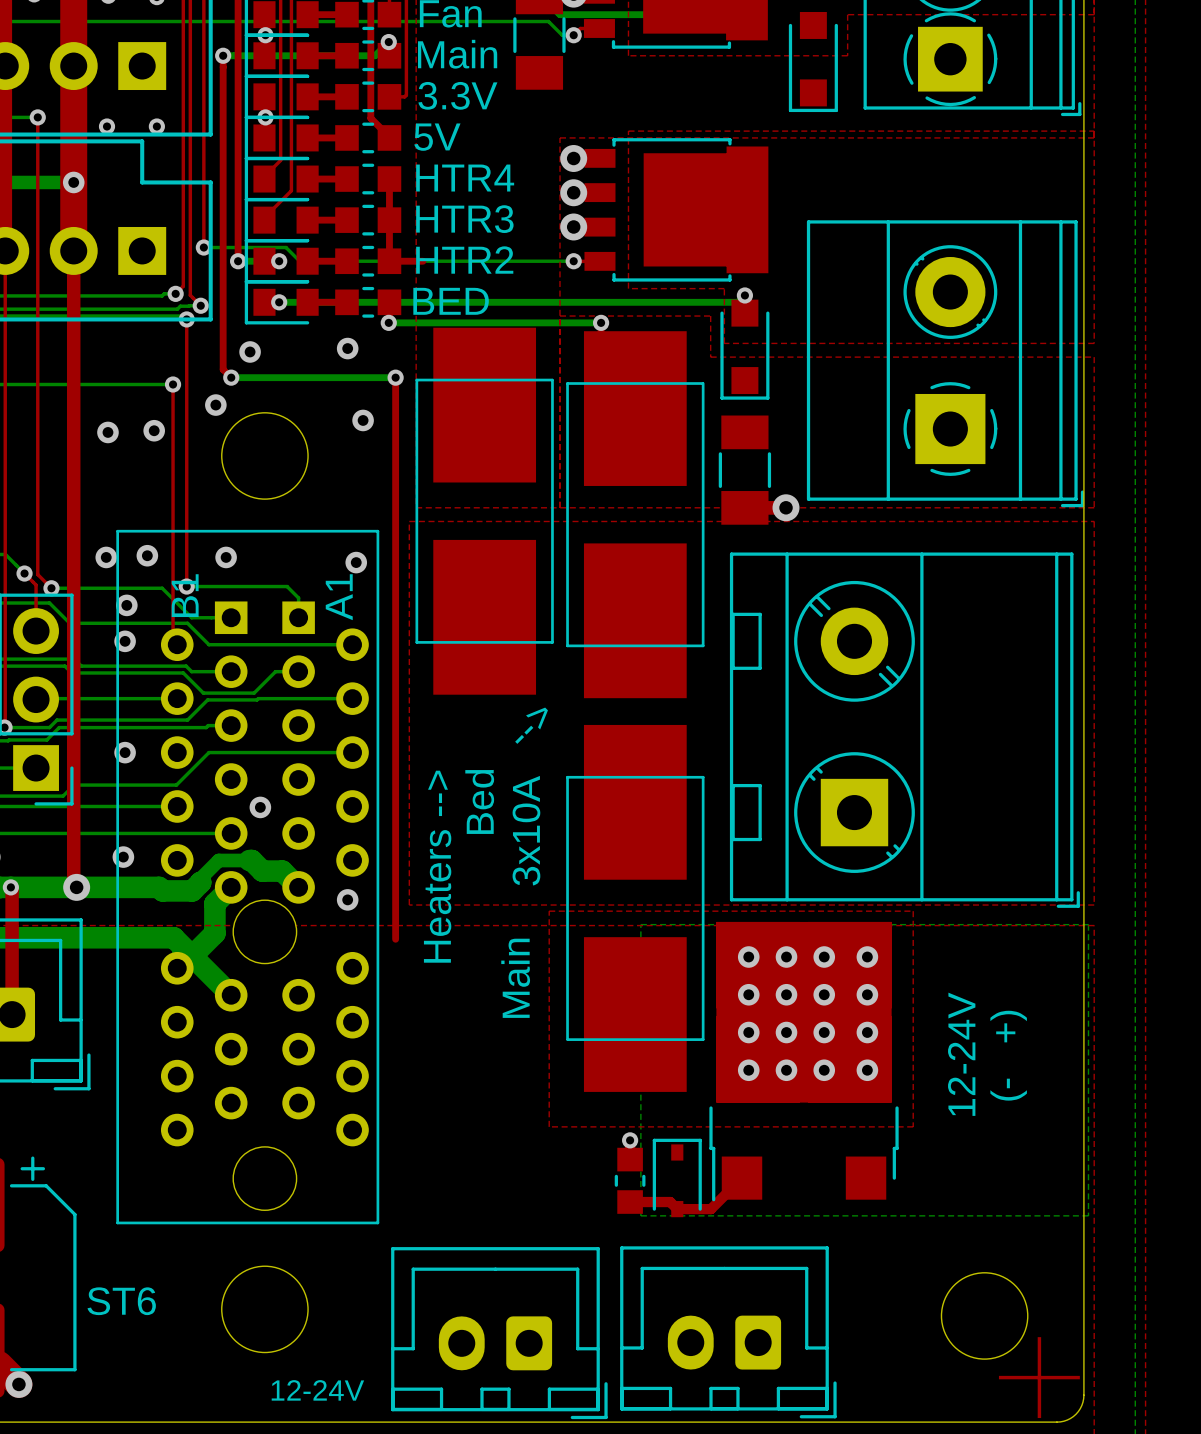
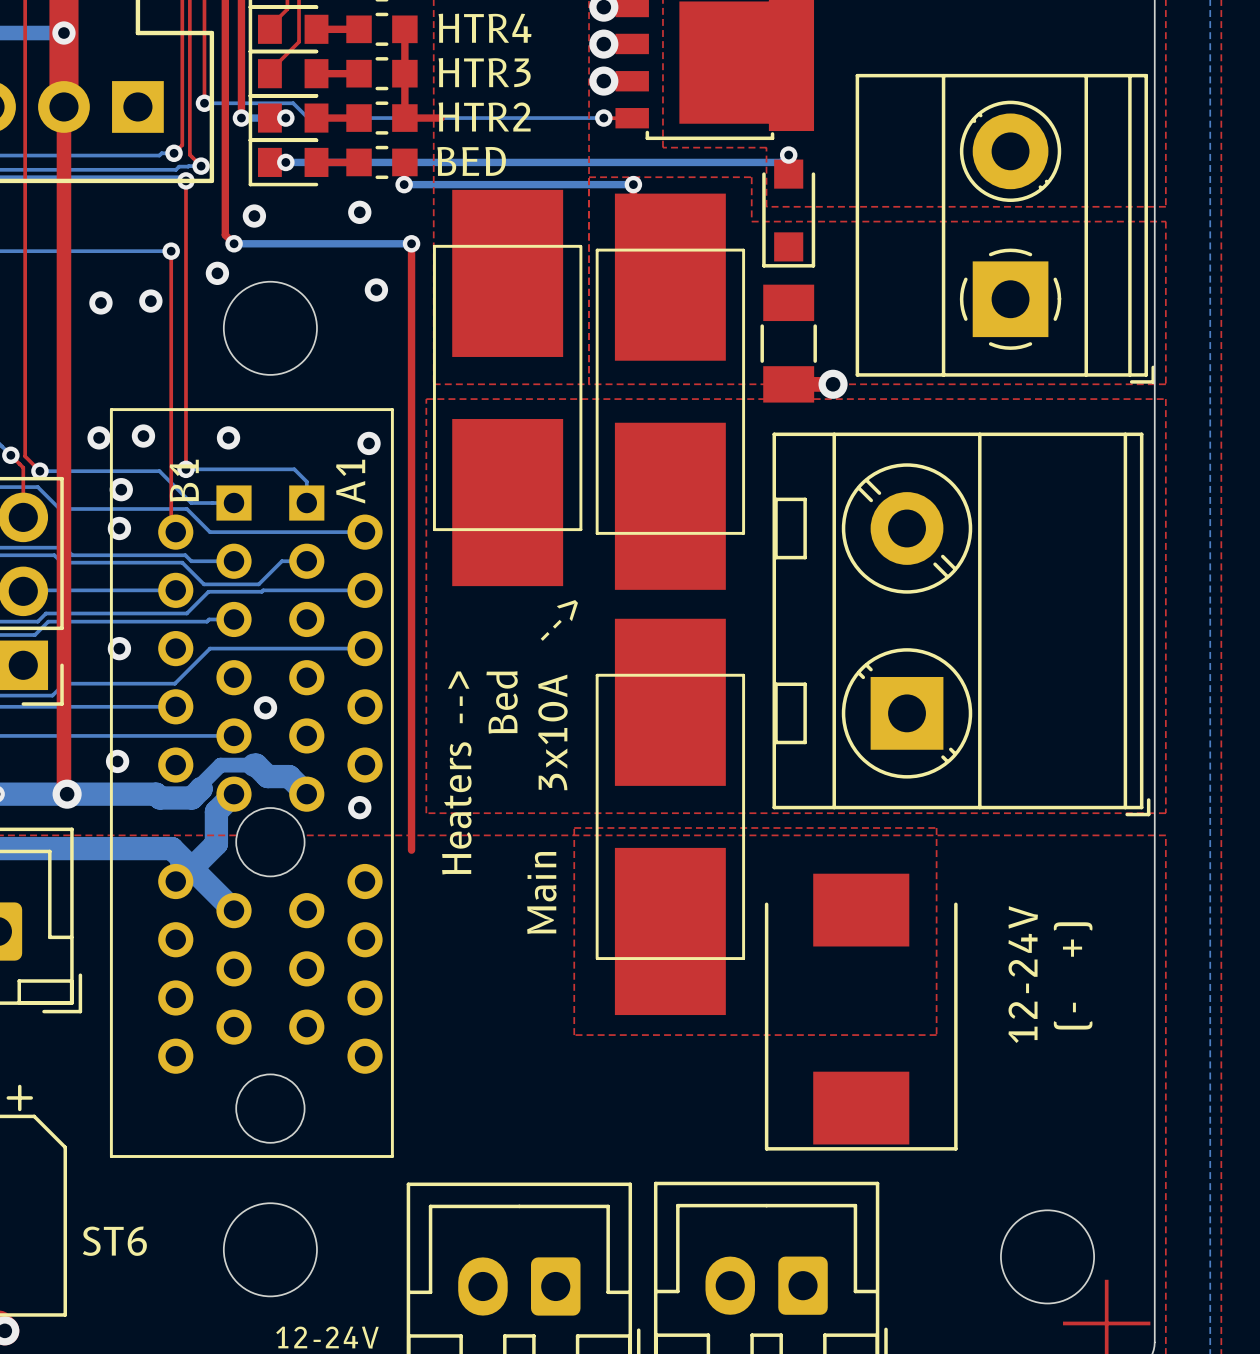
top zone outline: (549, 911) (913, 911) (913, 1126) (549, 1126) (549, 911) -> (574, 827) (574, 1035) (936, 1035) (936, 827) (574, 827)
bottom zone outline: (640, 924) (1088, 924) (1088, 1215) (640, 1215) (640, 924) -> none
via: (748, 957) -> none
via: (786, 957) -> none
via: (824, 957) -> none
via: (867, 957) -> none
via: (748, 994) -> none
via: (786, 994) -> none
via: (824, 994) -> none
via: (867, 994) -> none
via: (748, 1032) -> none
via: (786, 1032) -> none
via: (824, 1032) -> none
via: (867, 1032) -> none
part: (804, 1061) -> none
via: (748, 1070) -> none
via: (786, 1070) -> none
via: (824, 1070) -> none
via: (867, 1070) -> none
part: none -> (861, 1012)
via: (630, 1140) -> none
part: (677, 1177) -> none
top track: (742, 1178) (710, 1209) (677, 1209) (670, 1202) (630, 1202) -> none
part: (630, 1180) -> none

